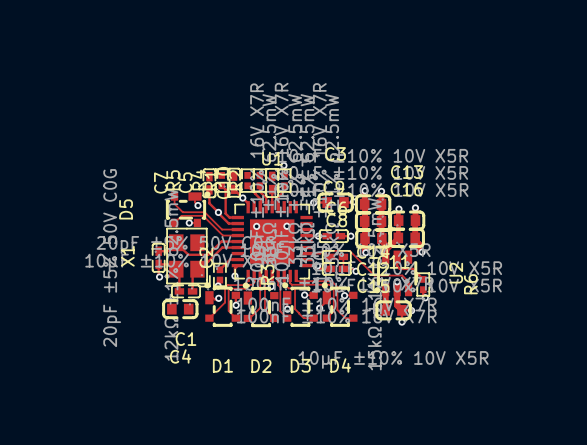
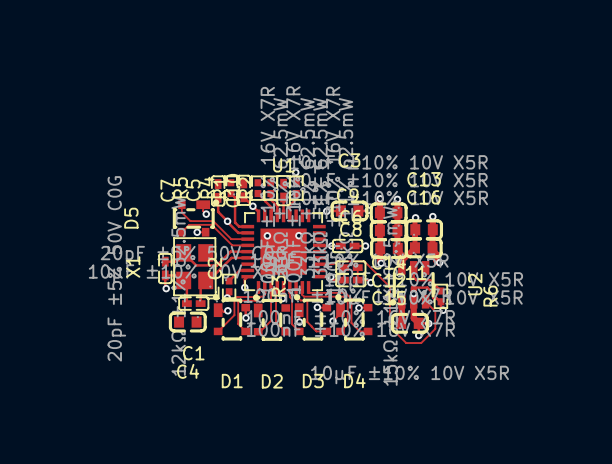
track: (374, 275) (402, 275) (408, 281) (408, 289) -> (389, 287) (389, 326) (406, 343) (421, 343) (435, 328) (435, 311) (425, 301)
track: none -> (413, 301) (413, 287) (427, 287) (433, 293) (433, 297) (440, 301)

